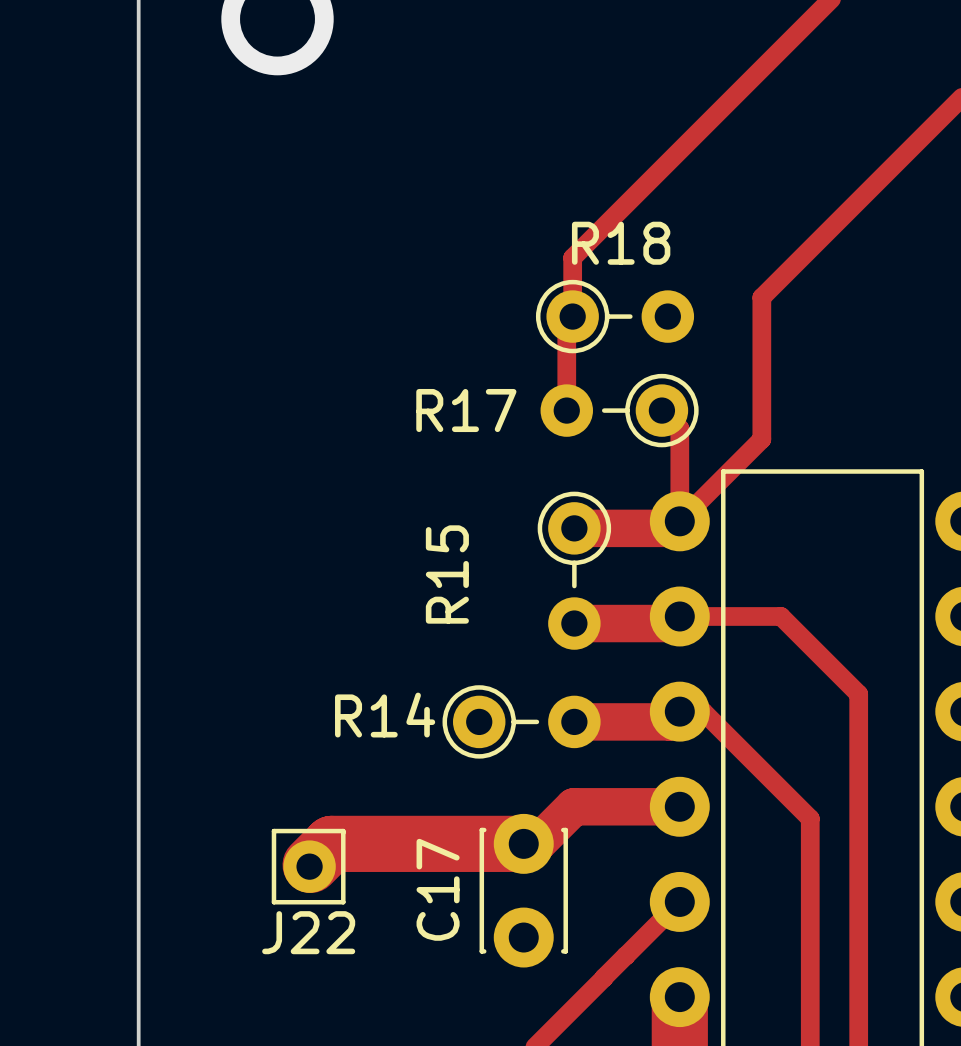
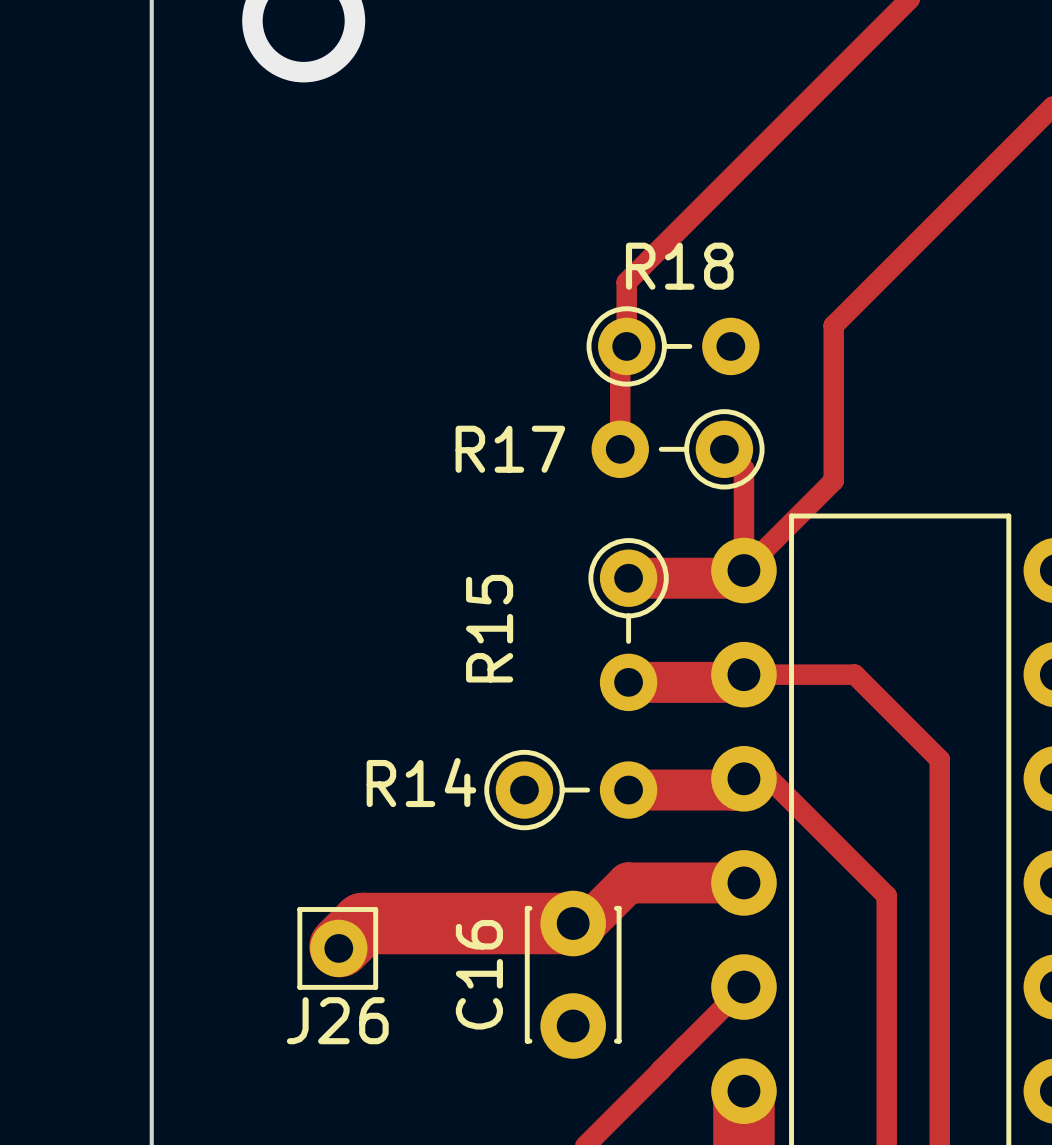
C17 name: C17 (438, 889) -> C16 (479, 974)
J22 name: J22 (308, 932) -> J26 (337, 1020)

